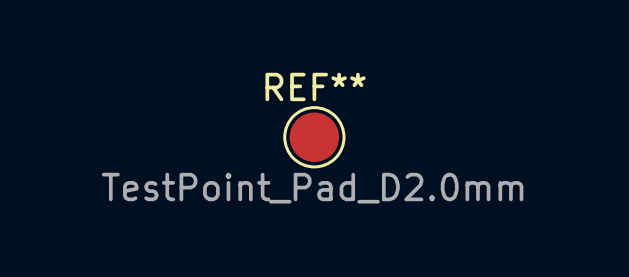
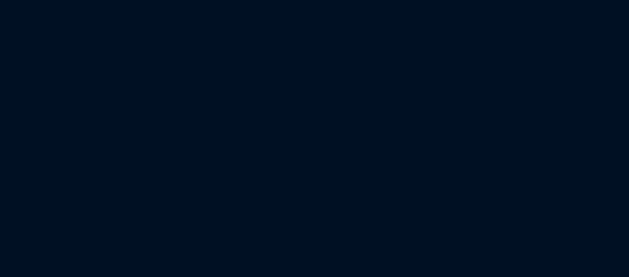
REF**: TestPoint_Pad_D2.0mm (314, 137) -> none

